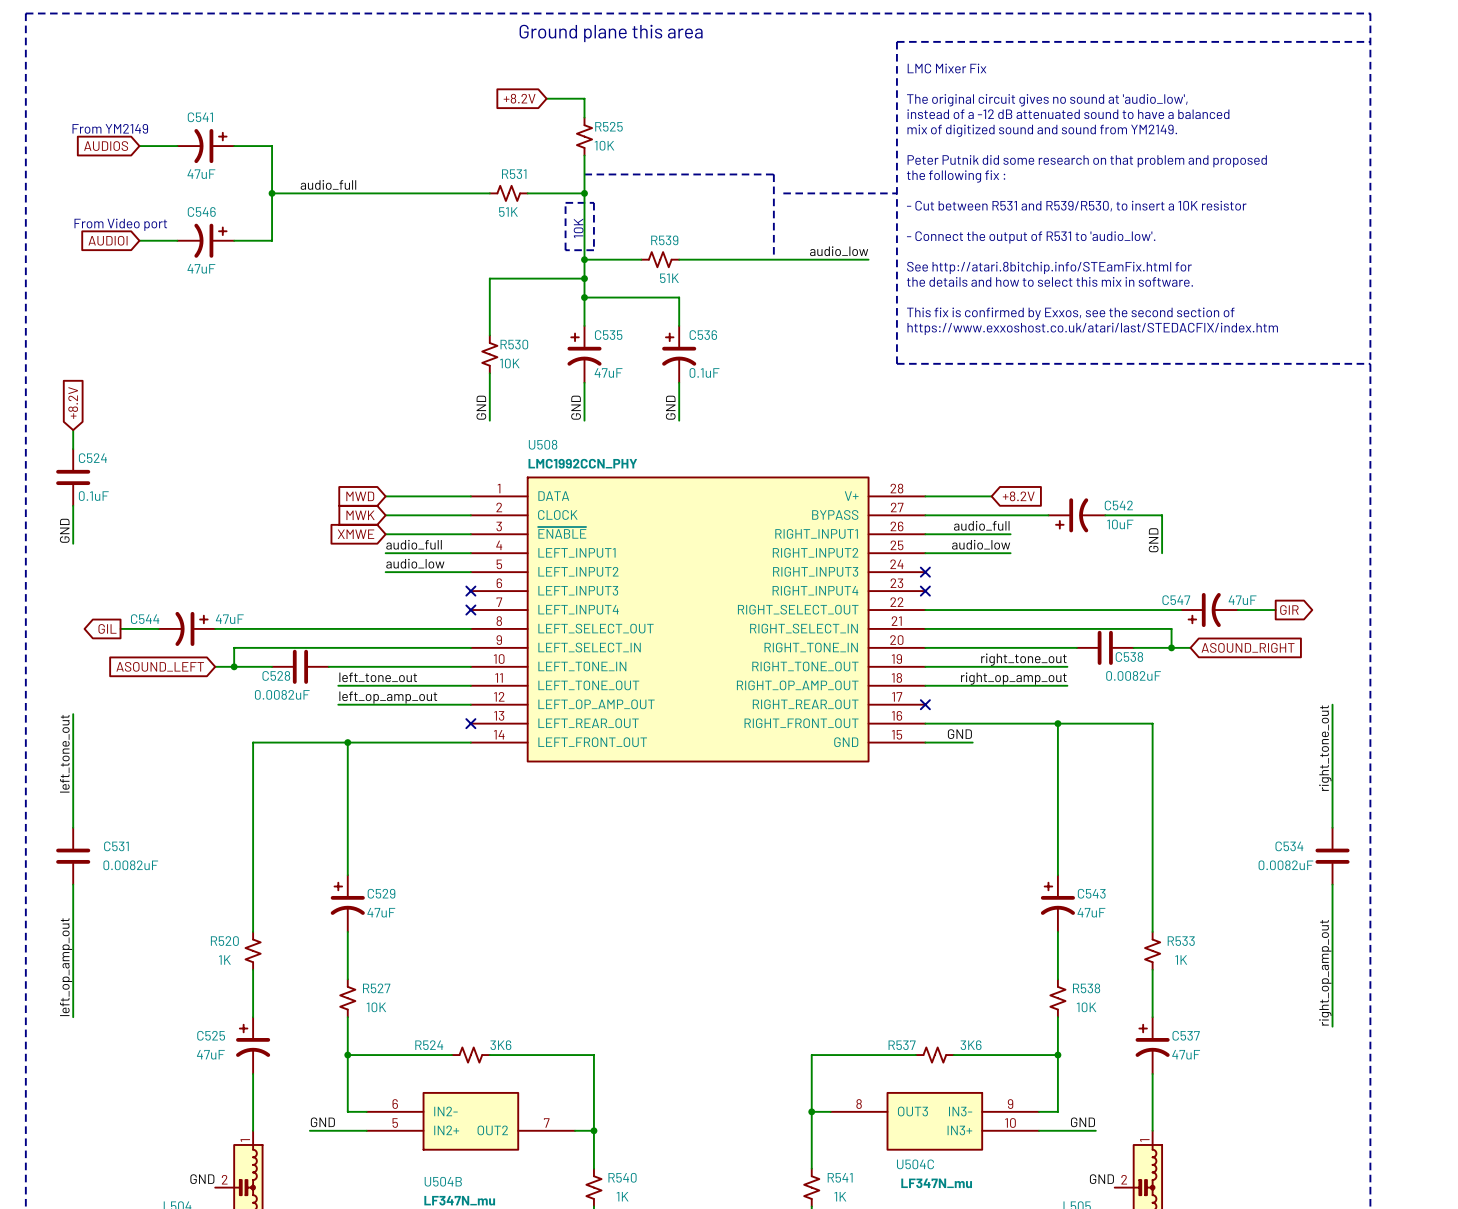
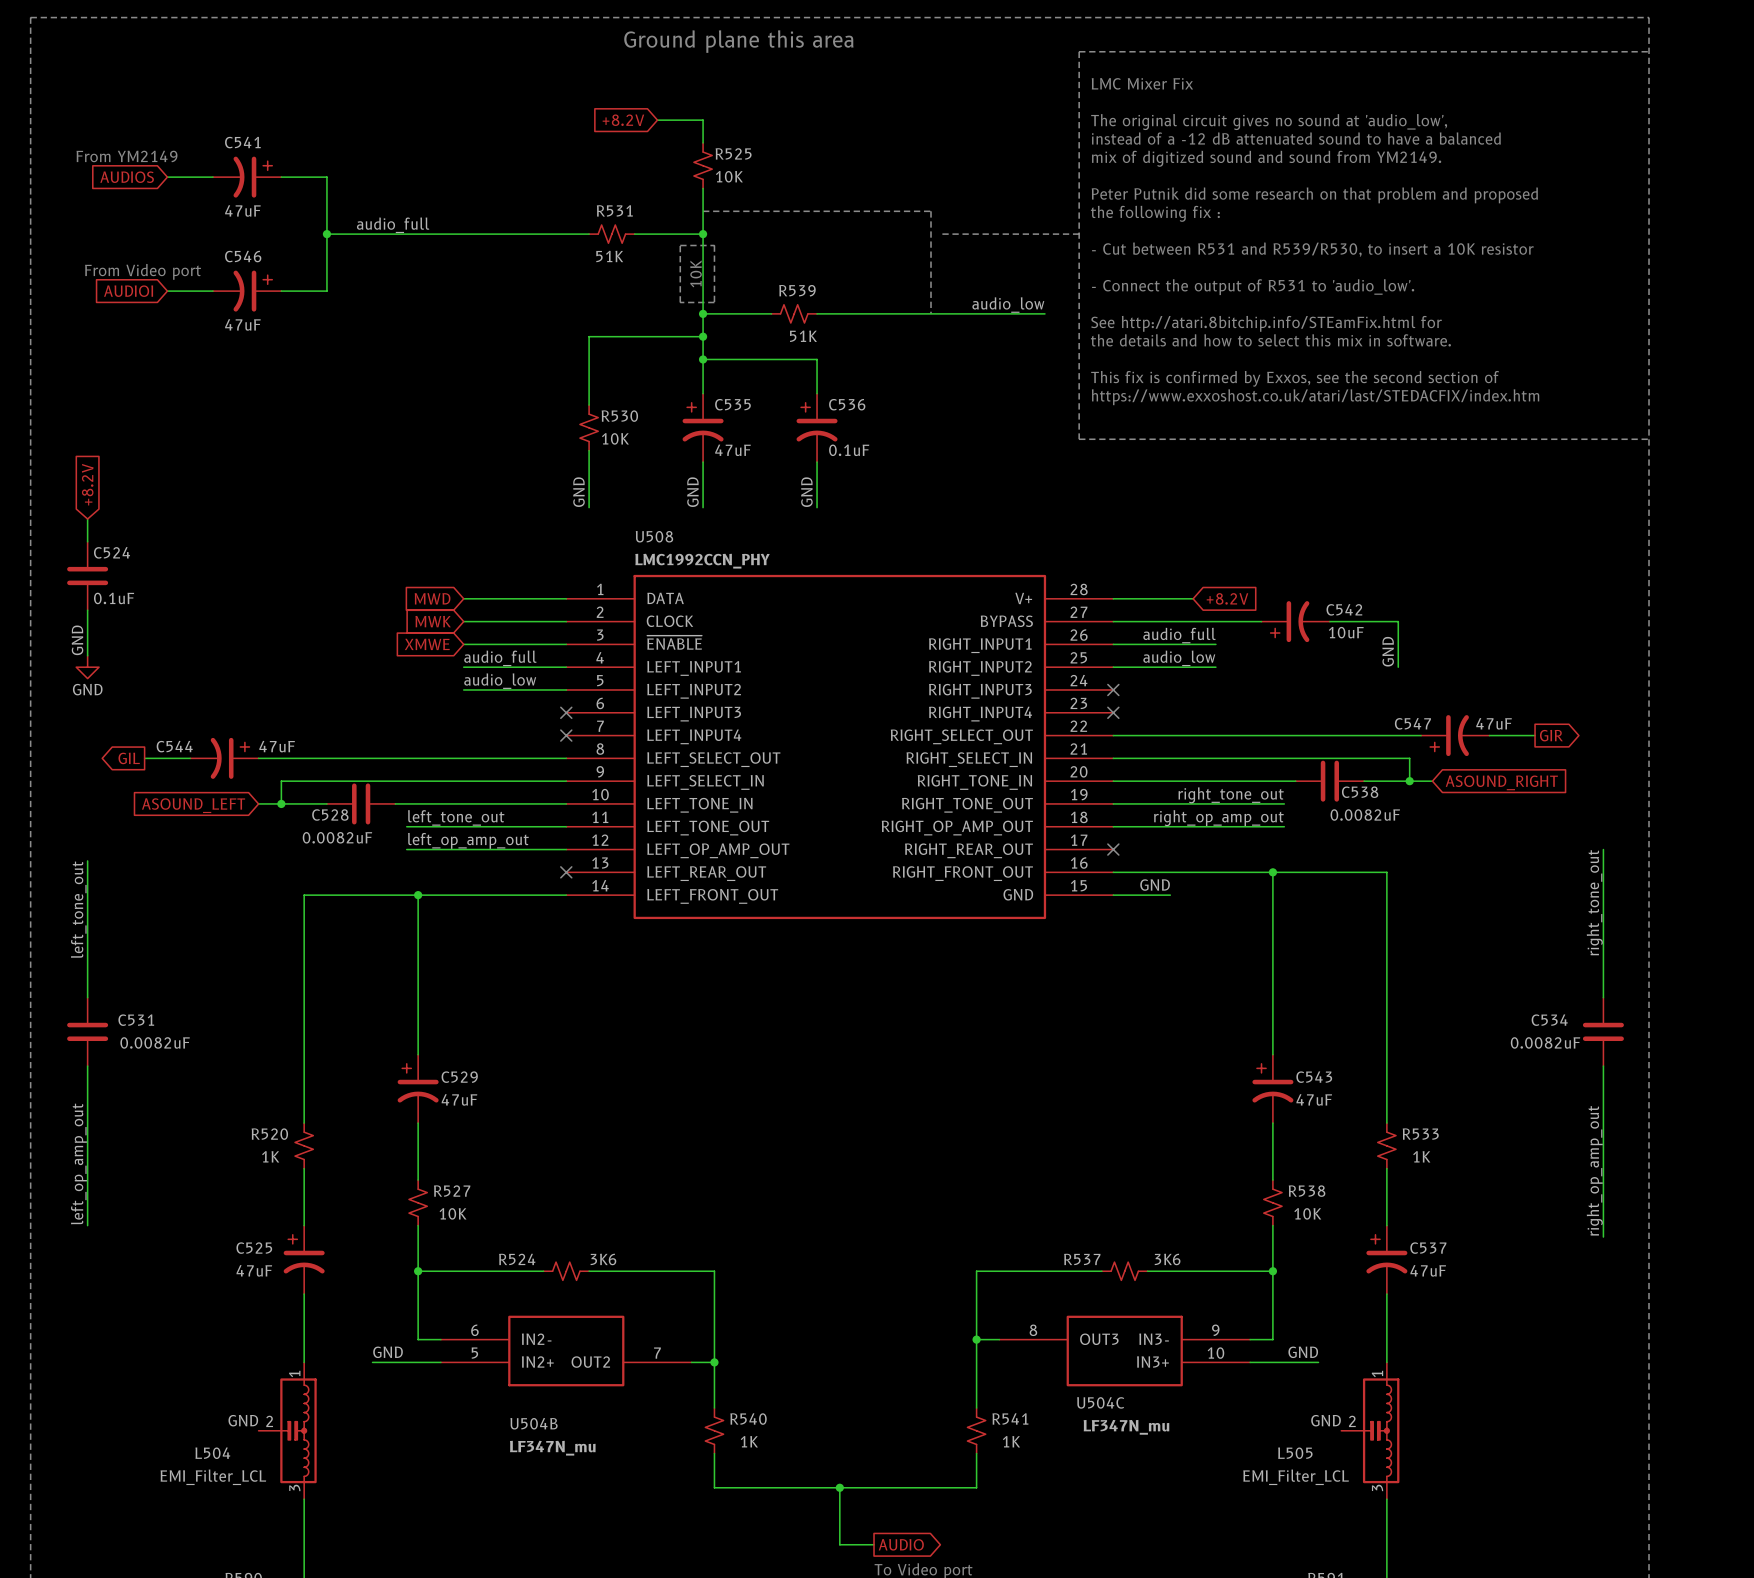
power symbol: none -> GND (87, 667)

